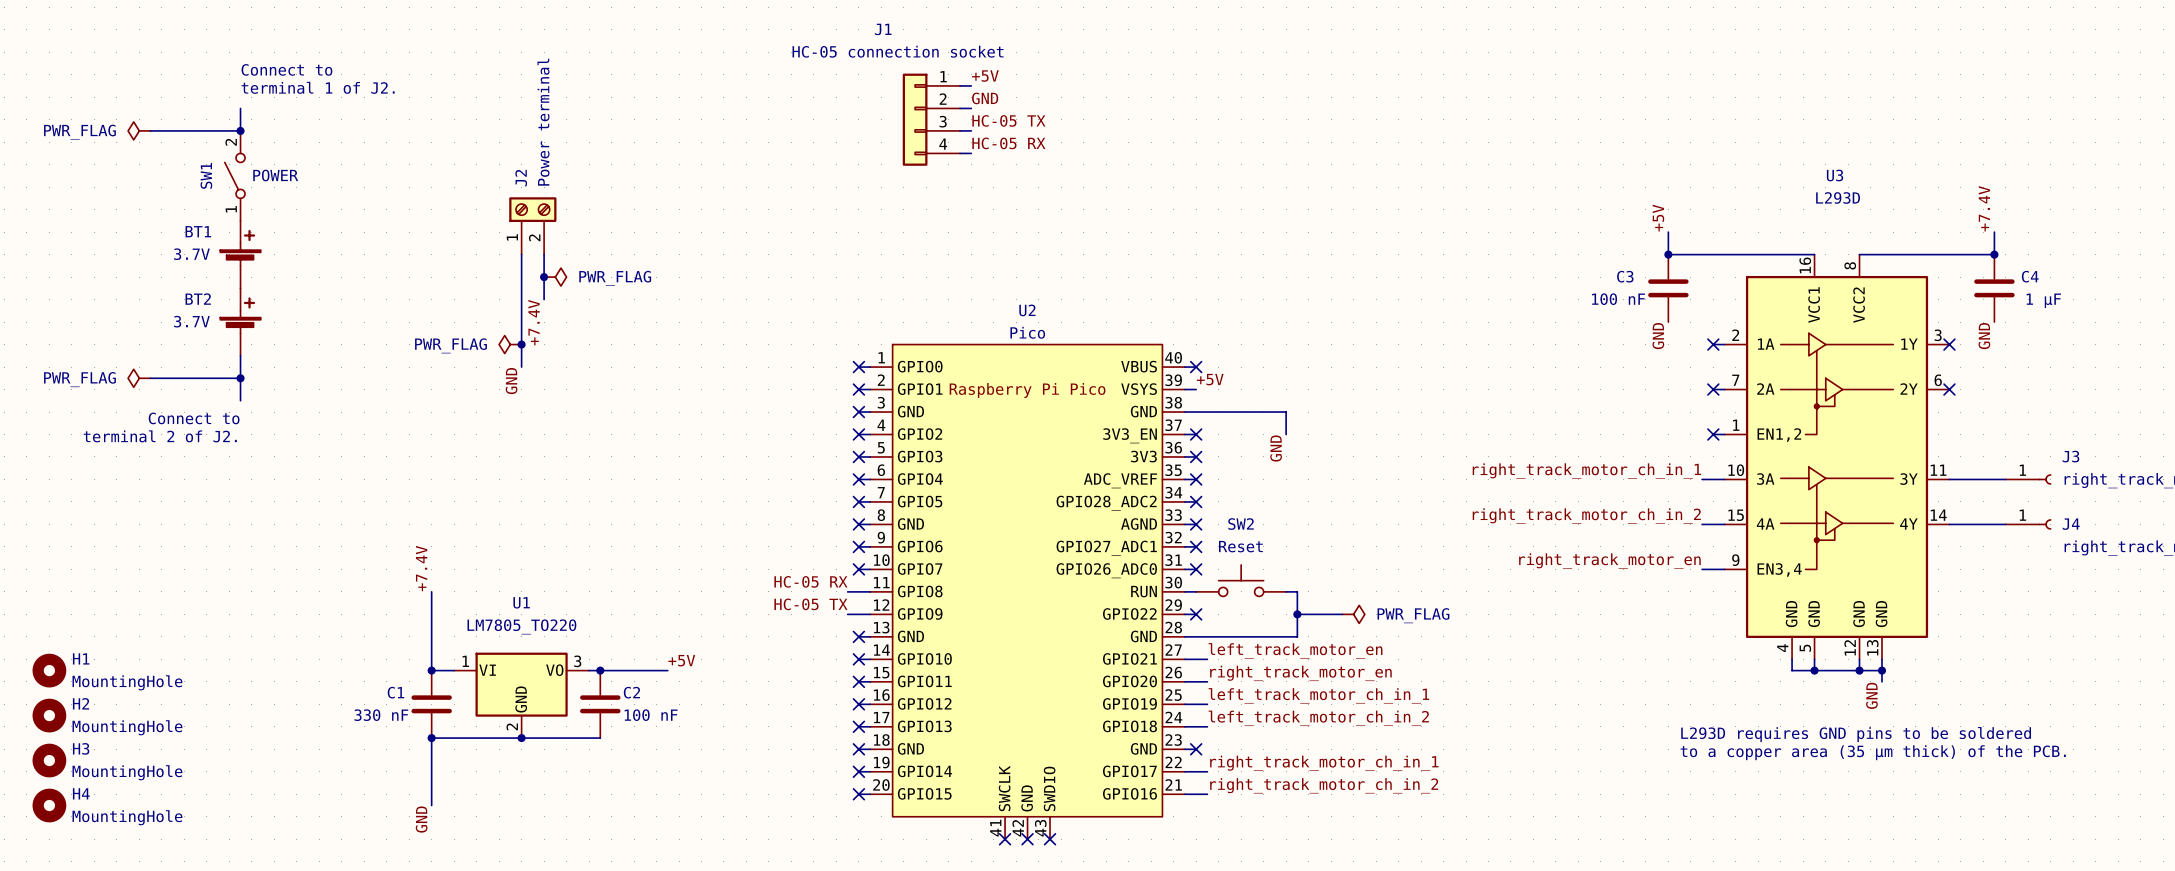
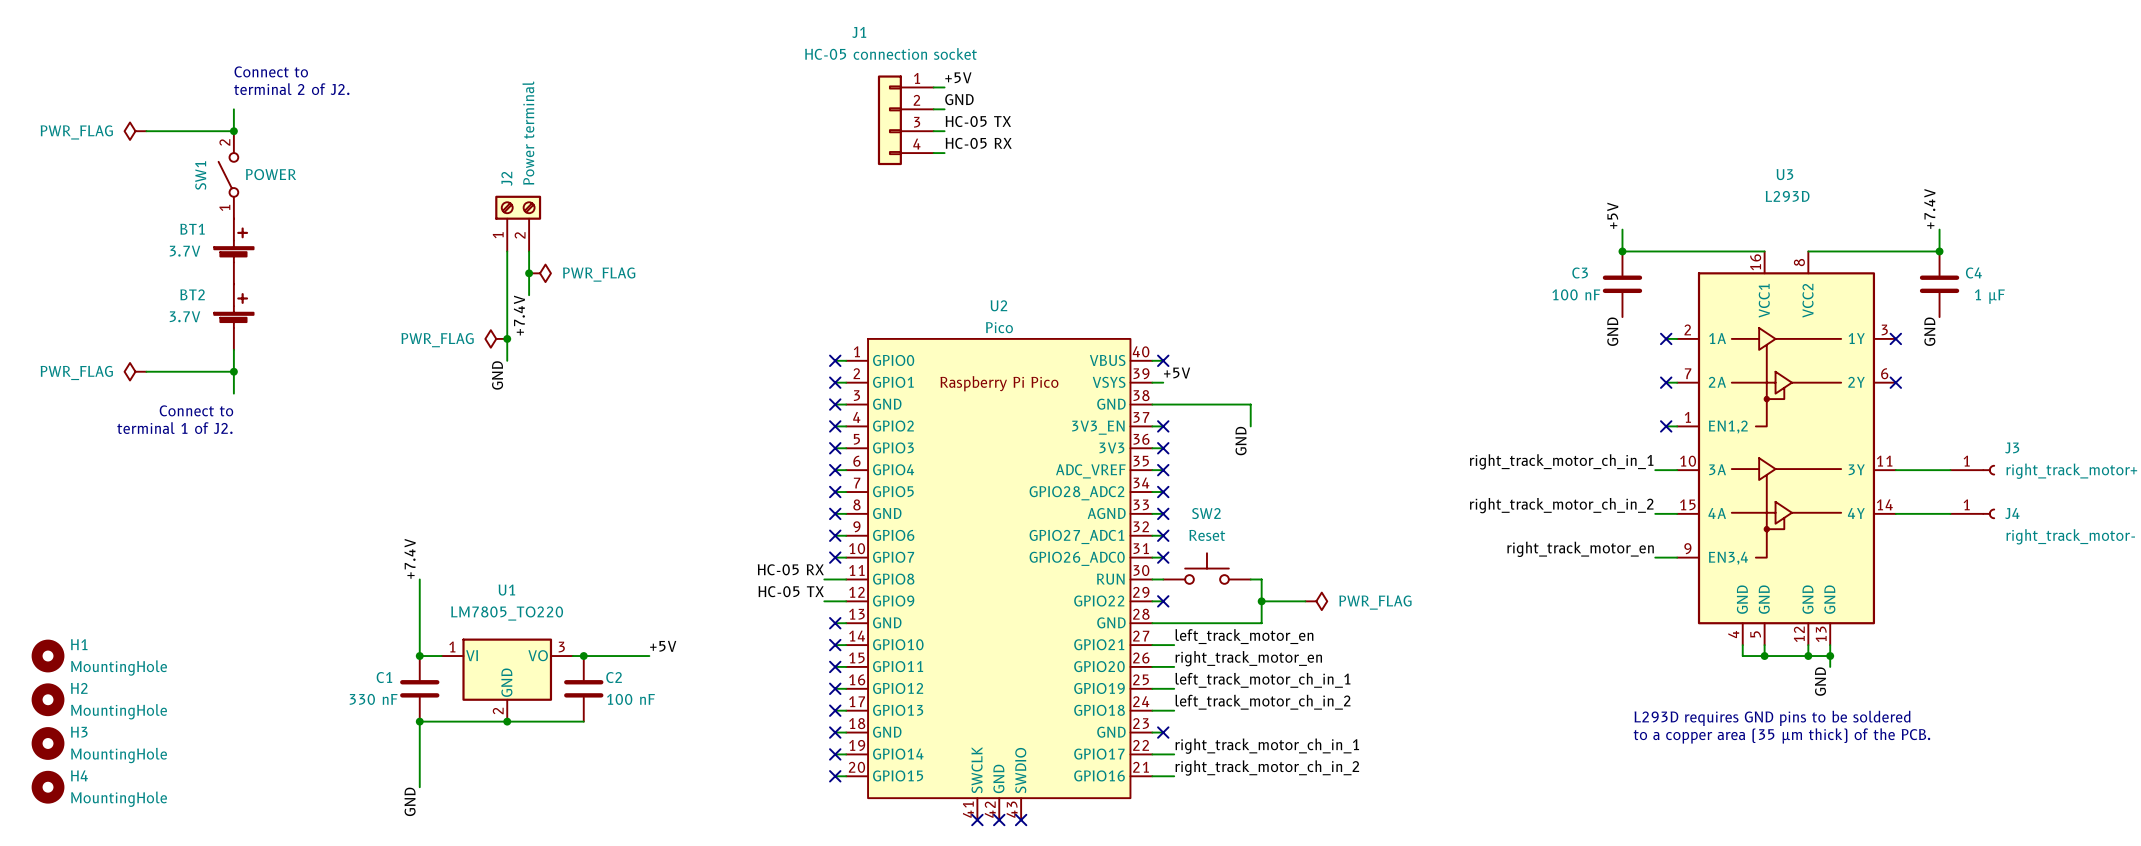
text: terminal 1 of J2. (318, 87) -> terminal 2 of J2. (291, 89)
text: terminal 2 of J2. (160, 436) -> terminal 1 of J2. (174, 428)

